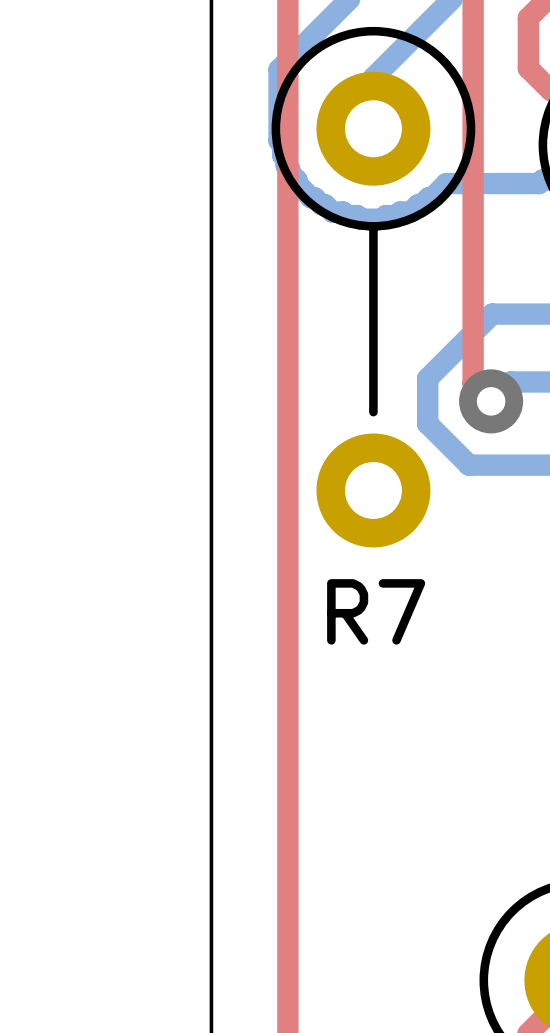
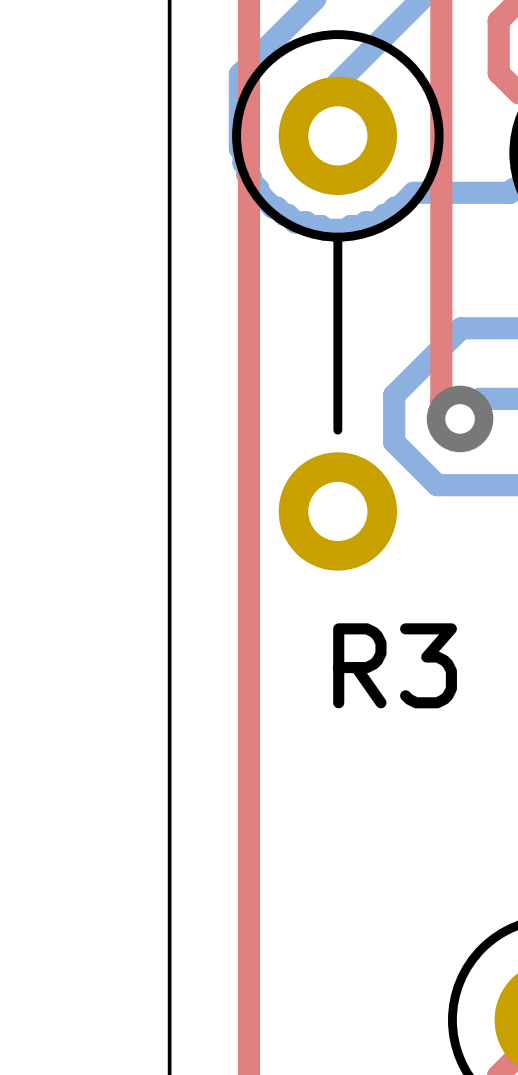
R7 name: R7 (376, 611) -> none
R3 name: none -> R3 (395, 665)

